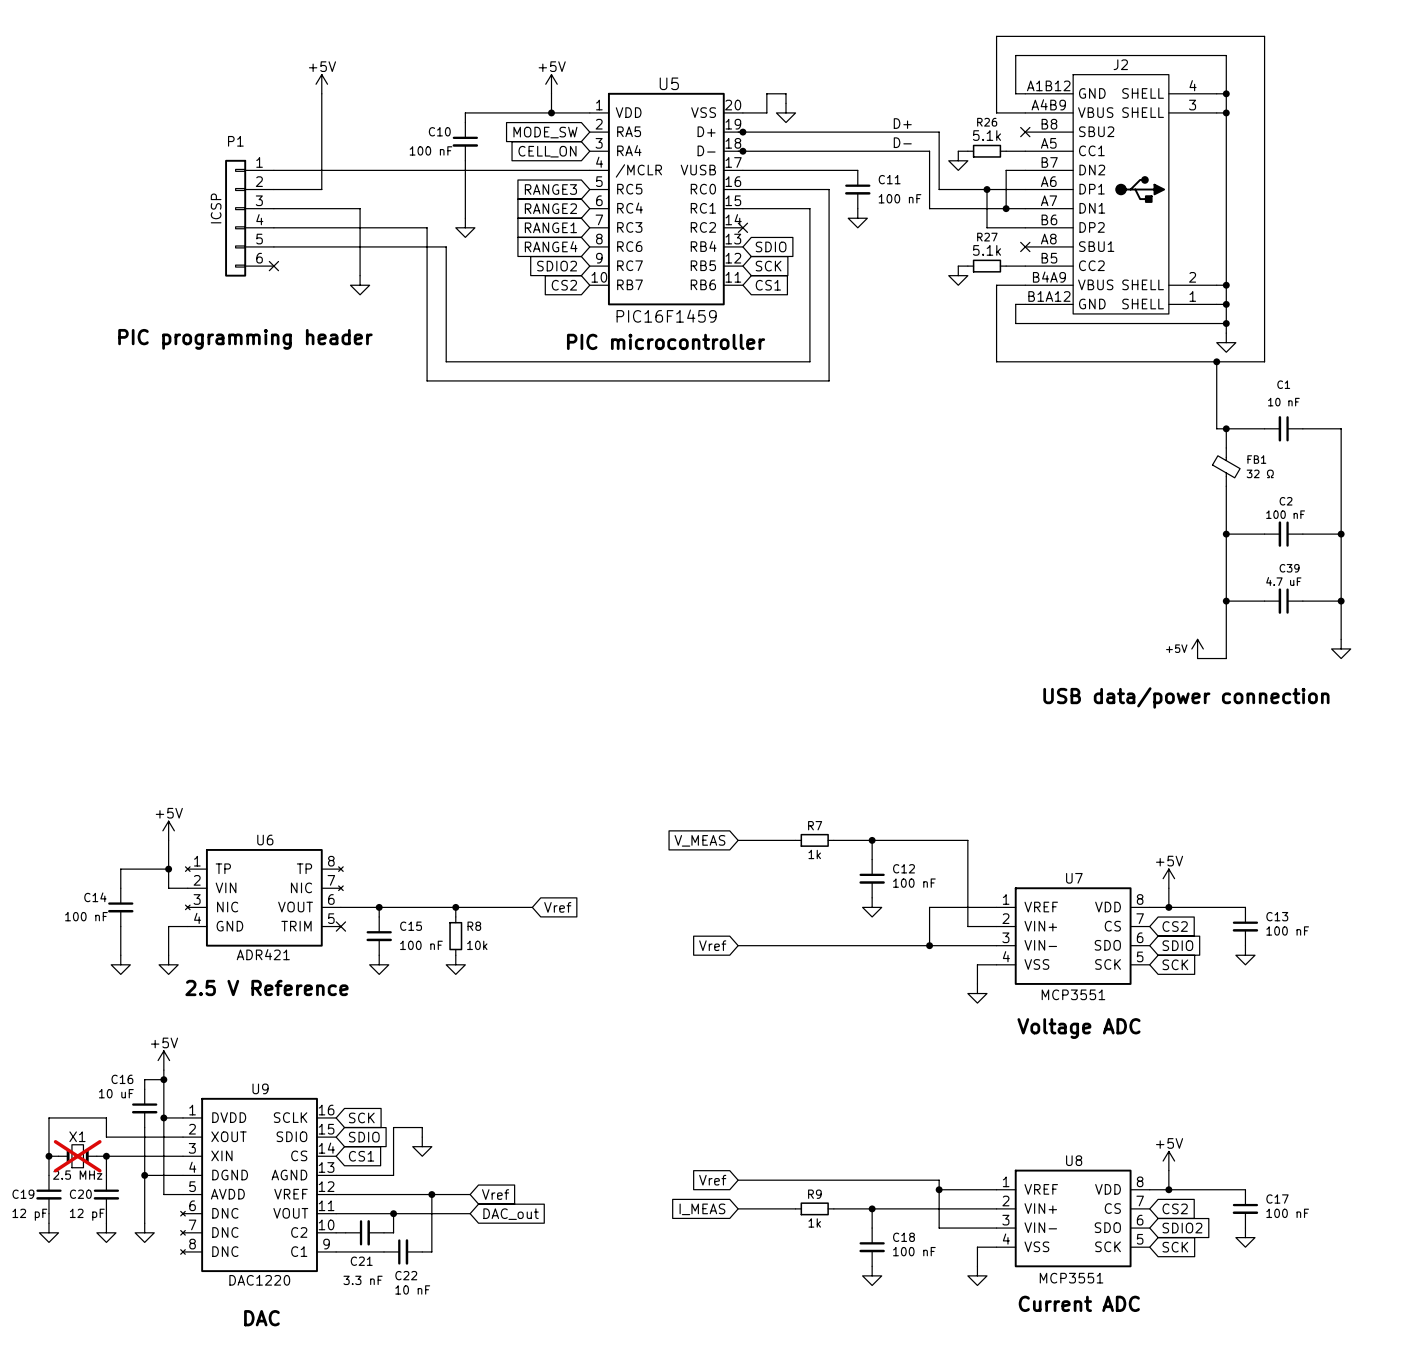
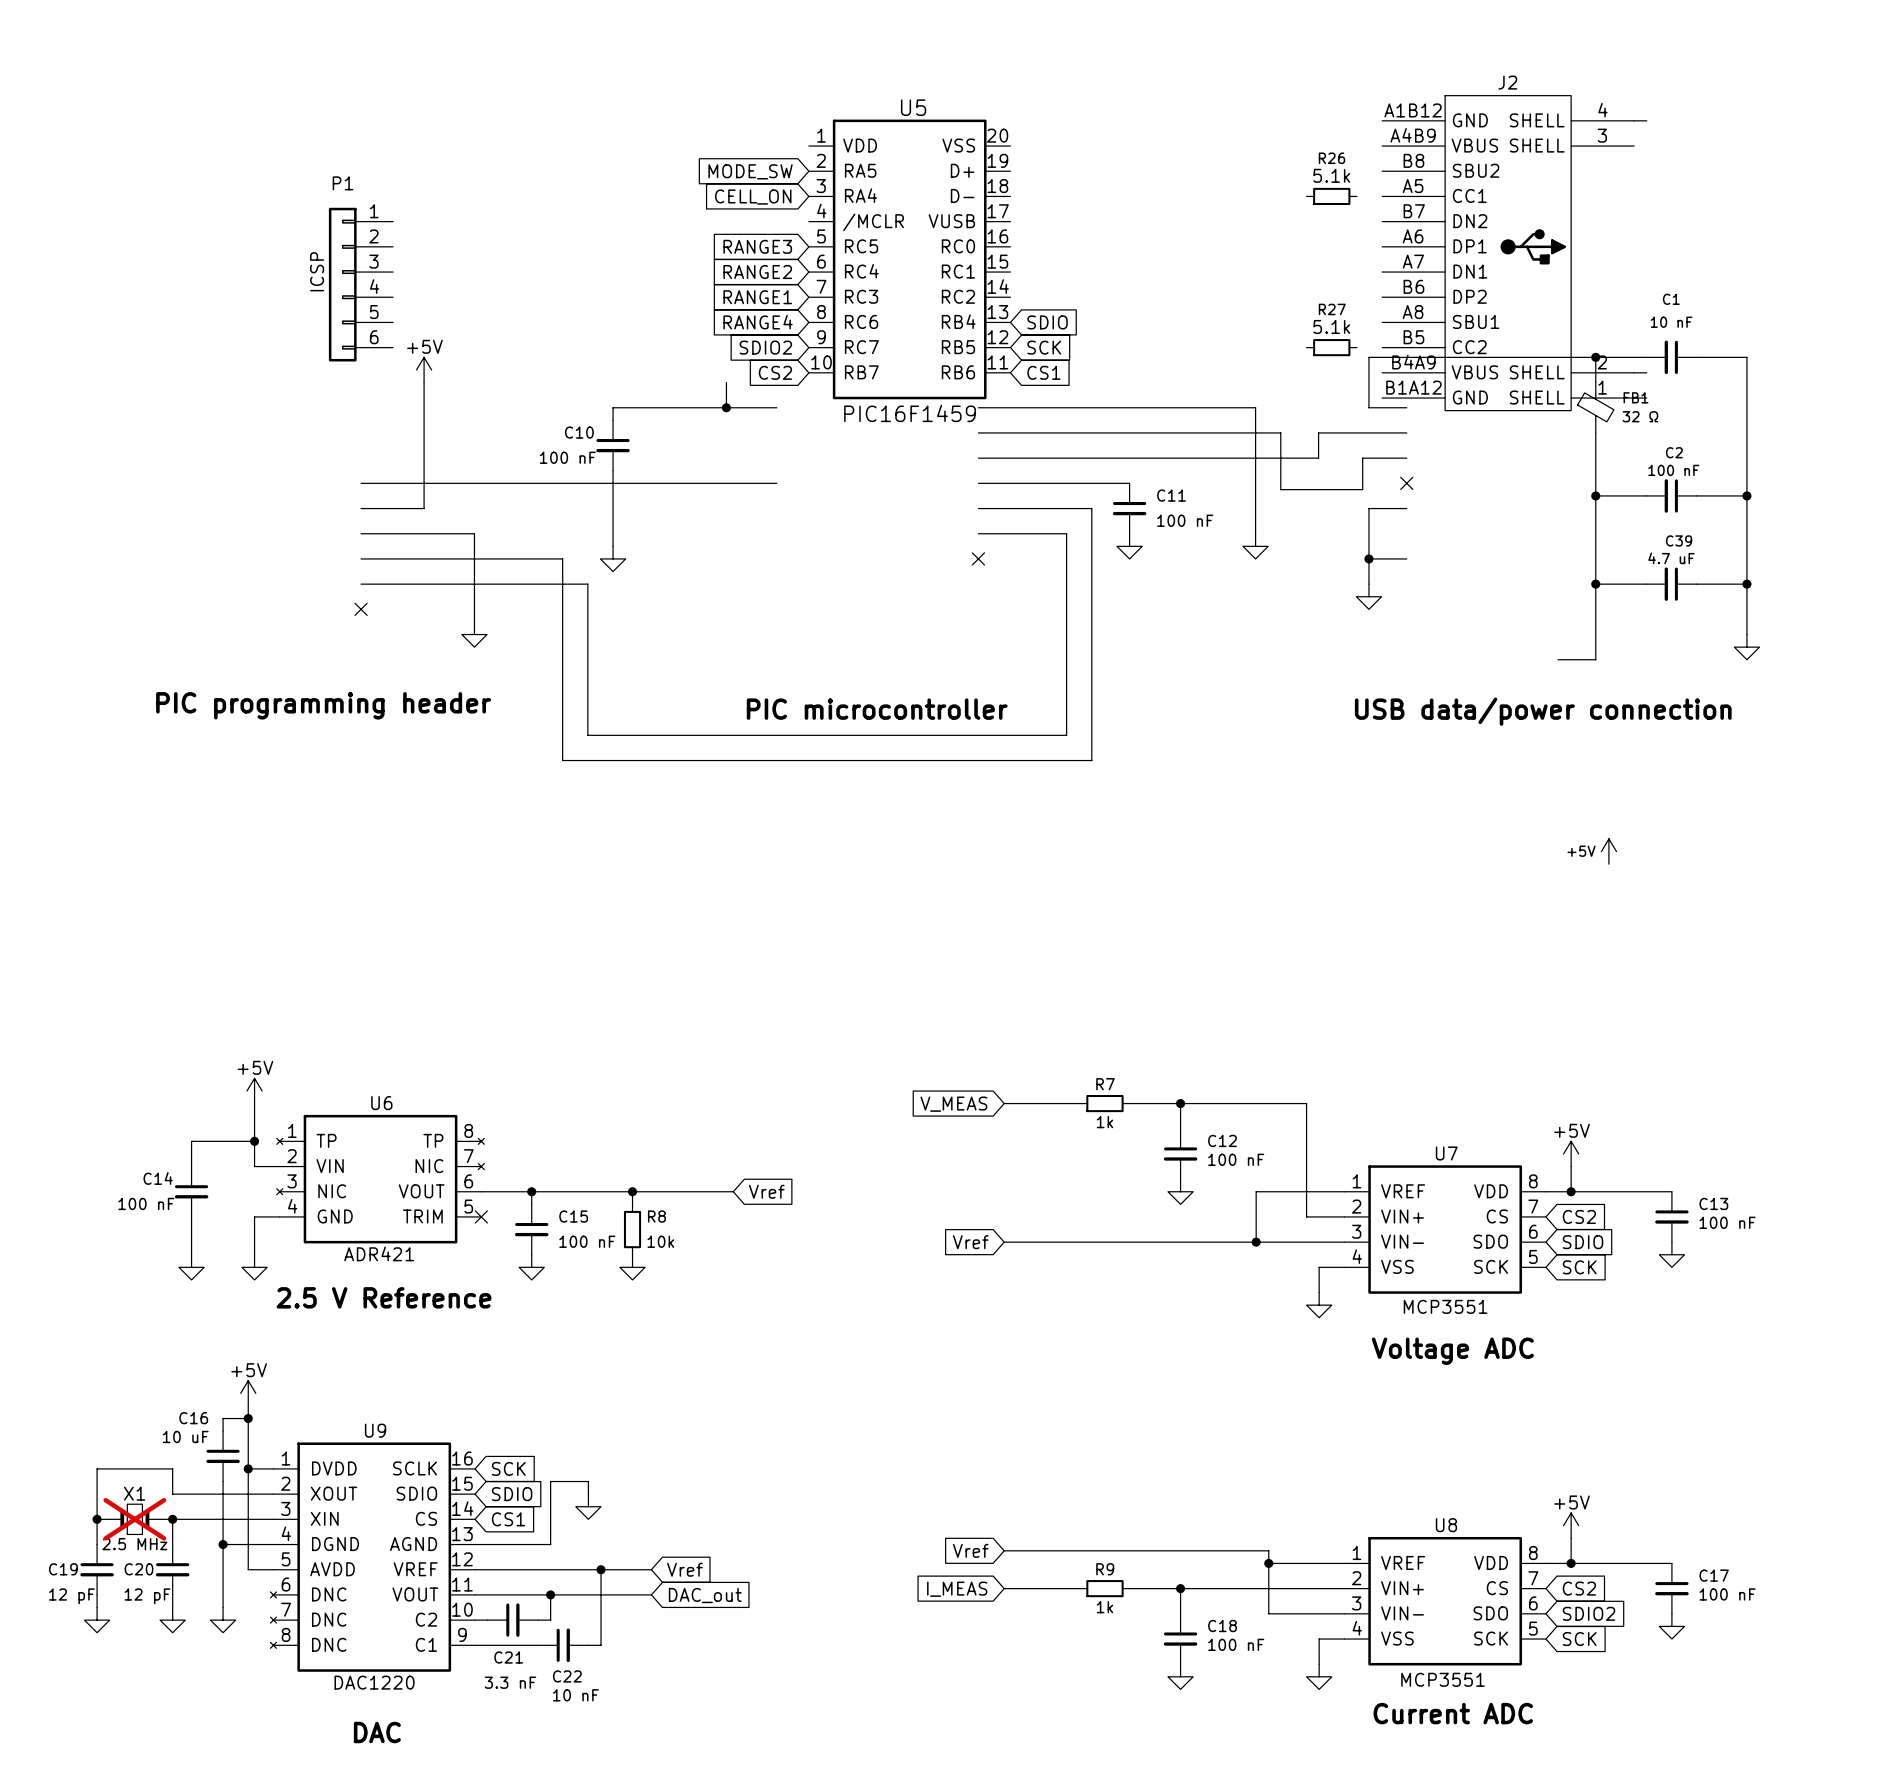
power symbol: +5V (321, 84) -> none
power symbol: +5V (551, 84) -> none
wire: (321, 93) (321, 189) (273, 189) -> none
wire: (551, 93) (551, 112) -> none
wire: (1025, 93) (1015, 93) (1015, 55) (1226, 55) (1226, 333) -> none
junction: (1226, 93) -> none
wire: (786, 103) (786, 93) (766, 93) (766, 112) (742, 112) -> none
junction: (551, 112) -> none
wire: (589, 112) (465, 112) (465, 122) -> none
power symbol: (786, 112) -> none
wire: (1025, 112) (996, 112) (996, 36) (1264, 36) (1264, 361) (996, 361) (996, 285) (1025, 285) -> none
wire: (1216, 112) (1226, 112) -> none
junction: (1226, 112) -> none
label: D+ (902, 123) -> none
wire: (738, 132) (939, 132) (939, 189) (1025, 189) -> none
junction: (742, 132) -> none
no-connect mark: (1025, 132) -> none
C10 position: (465, 141) -> (613, 445)
label: D- (902, 142) -> none
wire: (738, 151) (929, 151) (929, 208) (1025, 208) -> none
junction: (742, 151) -> none
wire: (958, 151) (967, 151) -> none
wire: (1006, 151) (1025, 151) -> none
wire: (465, 160) (465, 218) -> none
power symbol: (958, 160) -> none
wire: (273, 170) (589, 170) -> none
wire: (742, 170) (857, 170) -> none
wire: (1025, 170) (1006, 170) (1006, 208) -> none
wire: (742, 189) (829, 189) (829, 380) (427, 380) (427, 227) (273, 227) -> none
C11 position: (857, 189) -> (1129, 508)
wire: (987, 189) (987, 227) (1025, 227) -> none
junction: (987, 189) -> none
wire: (273, 208) (360, 208) (360, 275) -> none
wire: (742, 208) (809, 208) (809, 361) (446, 361) (446, 246) (273, 246) -> none
junction: (1006, 208) -> none
power symbol: (857, 218) -> none
power symbol: (465, 227) -> none
no-connect mark: (742, 227) -> none
no-connect mark: (1025, 246) -> none
no-connect mark: (273, 266) -> none
wire: (958, 266) (967, 266) -> none
wire: (1006, 266) (1025, 266) -> none
junction: none -> (1595, 357)
wire: none -> (1646, 357) (1368, 357) (1368, 407) (1406, 407)
power symbol: (958, 275) -> none
power symbol: none -> +5V (424, 369)
power symbol: (360, 285) -> none
junction: (1226, 285) -> none
wire: none -> (424, 382) (424, 508) (361, 508)
wire: none -> (726, 382) (726, 407)
wire: (1025, 304) (1015, 304) (1015, 323) (1226, 323) -> none
junction: (1226, 304) -> none
junction: none -> (726, 407)
wire: none -> (776, 407) (613, 407) (613, 420)
wire: none -> (978, 407) (1255, 407) (1255, 533)
junction: (1226, 323) -> none
wire: none -> (978, 432) (1280, 432) (1280, 489) (1362, 489) (1362, 458) (1406, 458)
wire: none -> (1406, 432) (1318, 432) (1318, 458) (978, 458)
text: PIC programming header (245, 339) -> none
text: PIC microcontroller (666, 341) -> none
power symbol: (1226, 342) -> none
wire: none -> (613, 470) (613, 546)
wire: (1216, 361) (1216, 428) (1264, 428) -> none
junction: (1216, 361) -> none
wire: none -> (361, 483) (776, 483)
wire: none -> (978, 483) (1129, 483)
no-connect mark: none -> (1406, 483)
junction: none -> (1595, 495)
junction: none -> (1746, 495)
wire: none -> (978, 508) (1091, 508) (1091, 760) (562, 760) (562, 558) (361, 558)
wire: none -> (1406, 508) (1368, 508) (1368, 584)
wire: none -> (361, 533) (474, 533) (474, 621)
wire: none -> (978, 533) (1066, 533) (1066, 735) (587, 735) (587, 584) (361, 584)
power symbol: none -> (1129, 546)
power symbol: none -> (1255, 546)
power symbol: none -> (613, 558)
no-connect mark: none -> (978, 558)
wire: none -> (1368, 558) (1406, 558)
junction: none -> (1368, 558)
wire: (1226, 428) (1226, 447) -> (1595, 357) (1595, 382)
junction: (1226, 428) -> none
C1 position: (1283, 428) -> (1671, 357)
wire: (1302, 428) (1341, 428) (1341, 639) -> (1696, 357) (1746, 357) (1746, 634)
junction: none -> (1595, 584)
junction: none -> (1746, 584)
power symbol: none -> (1368, 596)
no-connect mark: none -> (361, 609)
FB1 position: (1226, 467) -> (1595, 407)
power symbol: none -> (474, 634)
wire: (1226, 486) (1226, 658) (1197, 658) -> (1595, 432) (1595, 659) (1557, 659)
power symbol: none -> (1746, 647)
wire: (1226, 534) (1264, 534) -> (1595, 495) (1646, 495)
junction: (1226, 534) -> none
C2 position: (1283, 534) -> (1671, 495)
wire: (1302, 534) (1341, 534) -> (1696, 495) (1746, 495)
junction: (1341, 534) -> none
text: none -> PIC programming header (323, 705)
text: none -> PIC microcontroller (877, 709)
wire: (1226, 601) (1264, 601) -> (1595, 584) (1646, 584)
junction: (1226, 601) -> none
C39 position: (1283, 601) -> (1671, 584)
wire: (1302, 601) (1341, 601) -> (1696, 584) (1746, 584)
junction: (1341, 601) -> none
power symbol: (1341, 648) -> none
text position: USB data/power connection (1186, 697) -> USB data/power connection (1543, 711)

